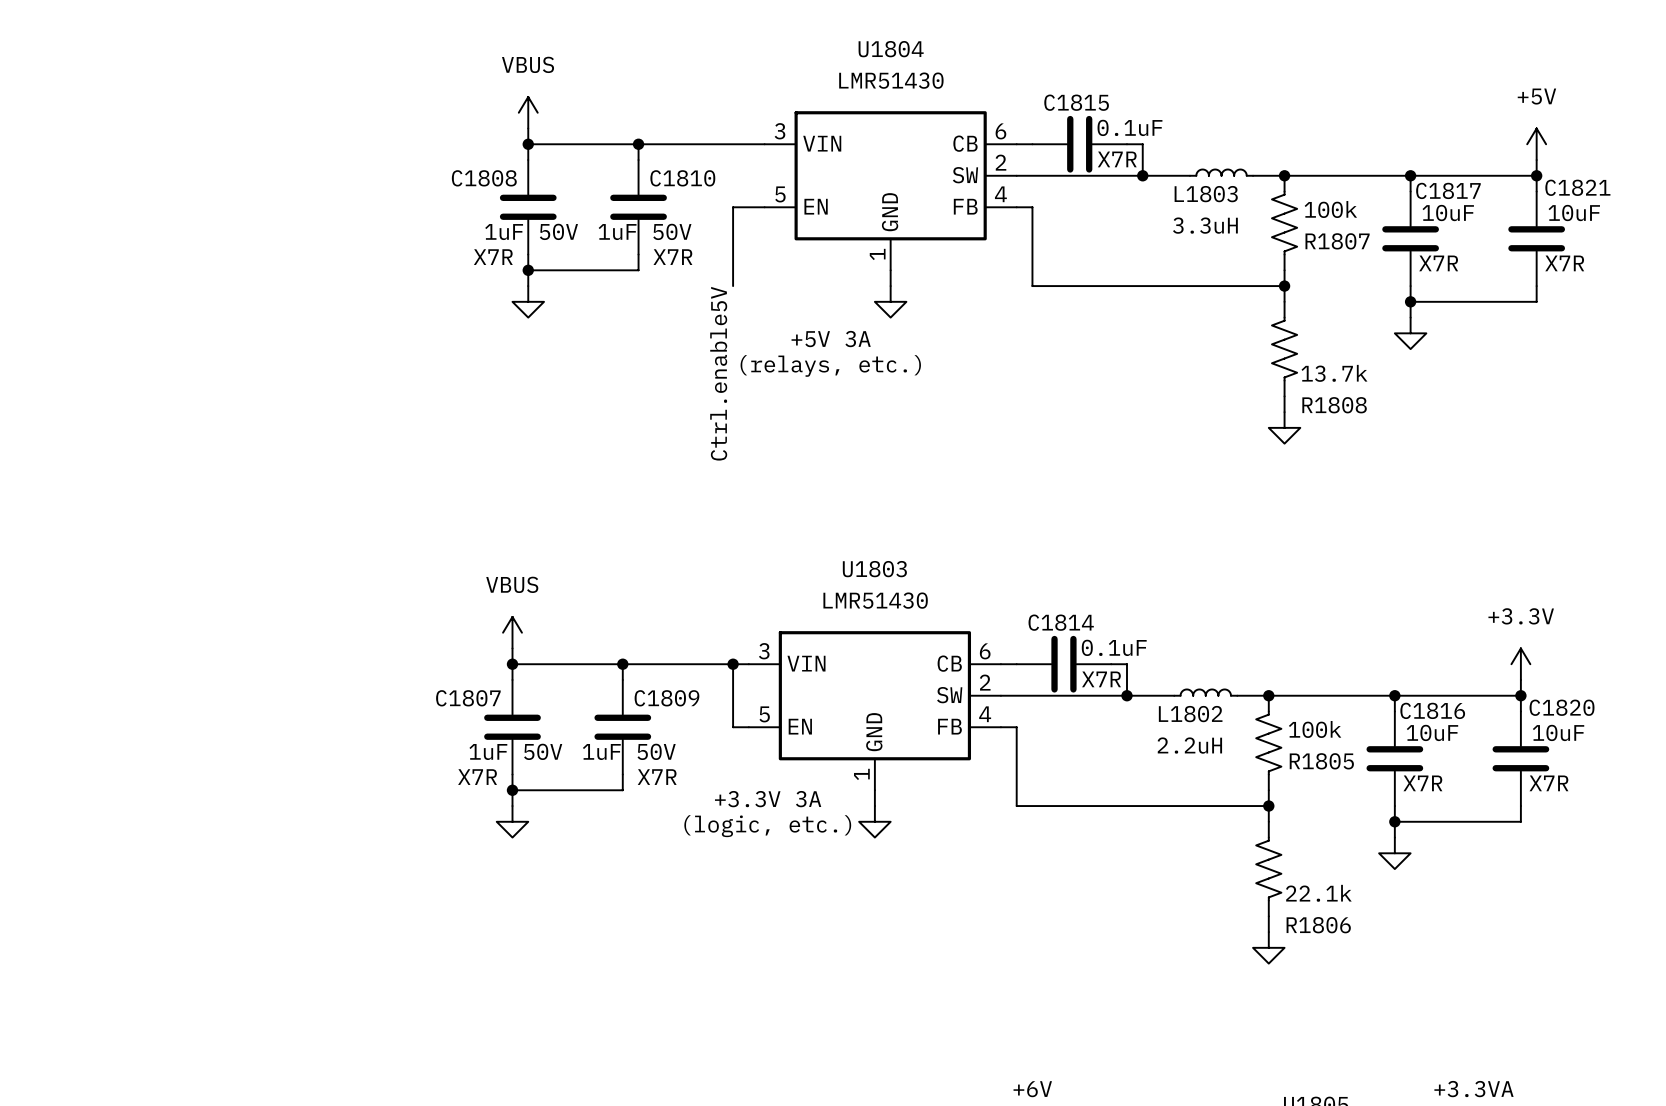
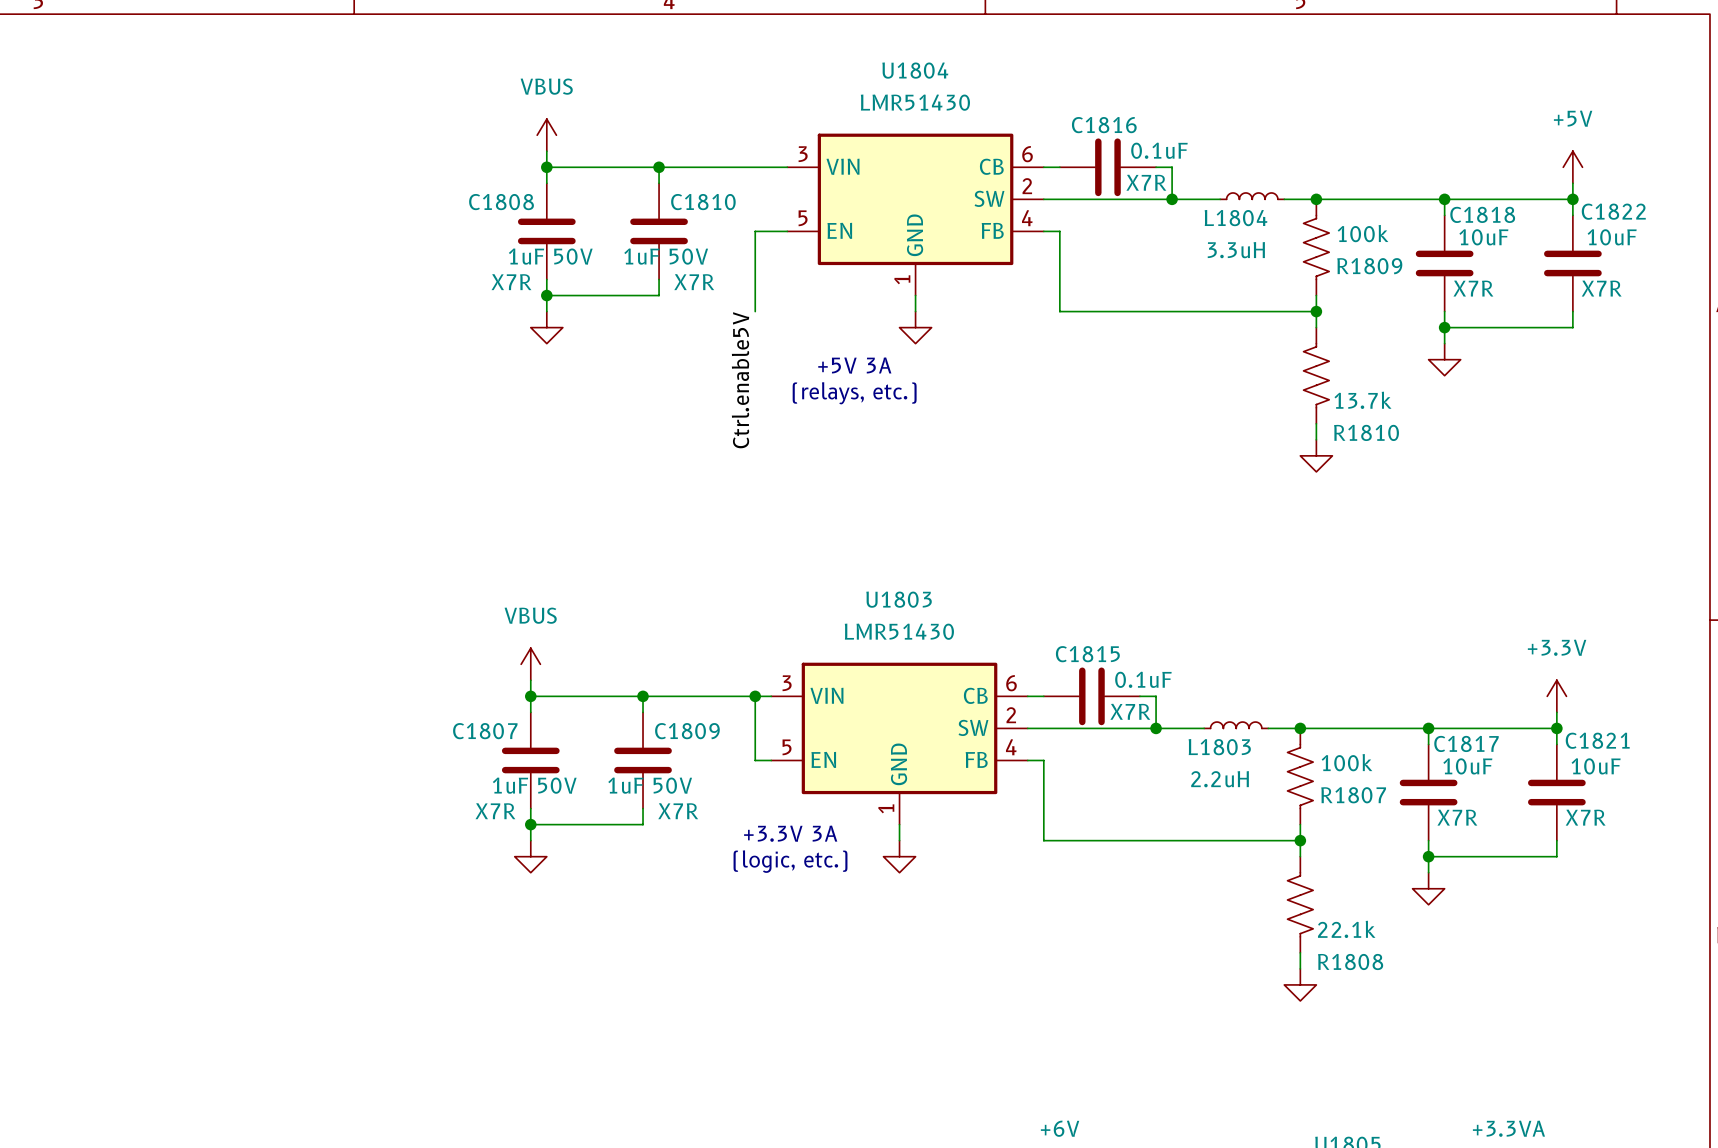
C1815 name: C1815 (1076, 102) -> C1816 (1104, 125)
C1821 name: C1821 (1577, 187) -> C1822 (1613, 211)
C1817 name: C1817 (1448, 190) -> C1818 (1482, 214)
L1803 name: L1803 (1206, 194) -> L1804 (1236, 218)
R1807 name: R1807 (1337, 241) -> R1809 (1369, 266)
R1808 name: R1808 (1334, 405) -> R1810 (1366, 432)
C1814 name: C1814 (1061, 622) -> C1815 (1087, 654)
C1820 name: C1820 (1562, 707) -> C1821 (1597, 740)
C1816 name: C1816 (1432, 710) -> C1817 (1466, 743)
L1802 name: L1802 (1190, 714) -> L1803 (1219, 747)
R1805 name: R1805 (1321, 761) -> R1807 (1353, 795)
R1806 name: R1806 (1318, 925) -> R1808 (1350, 961)

